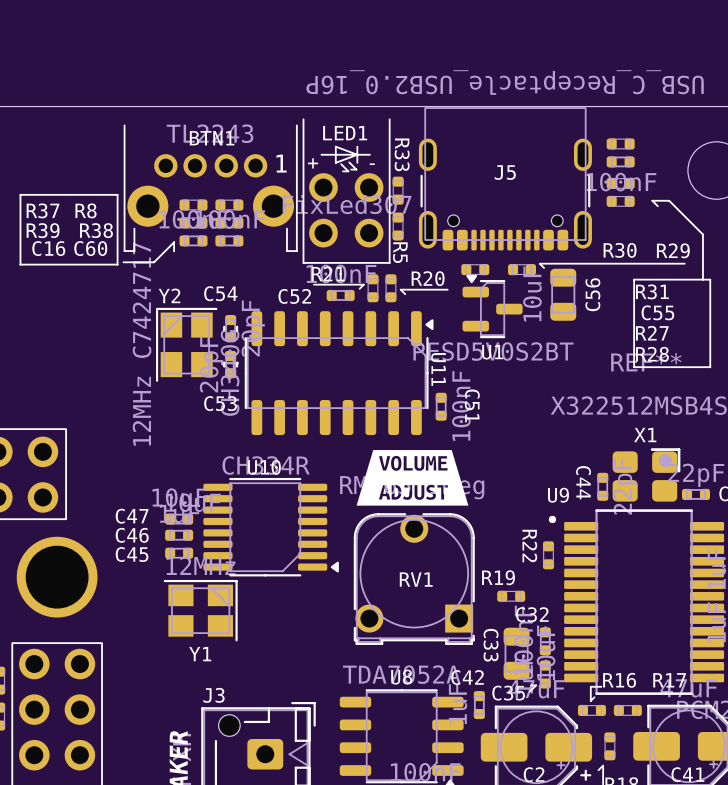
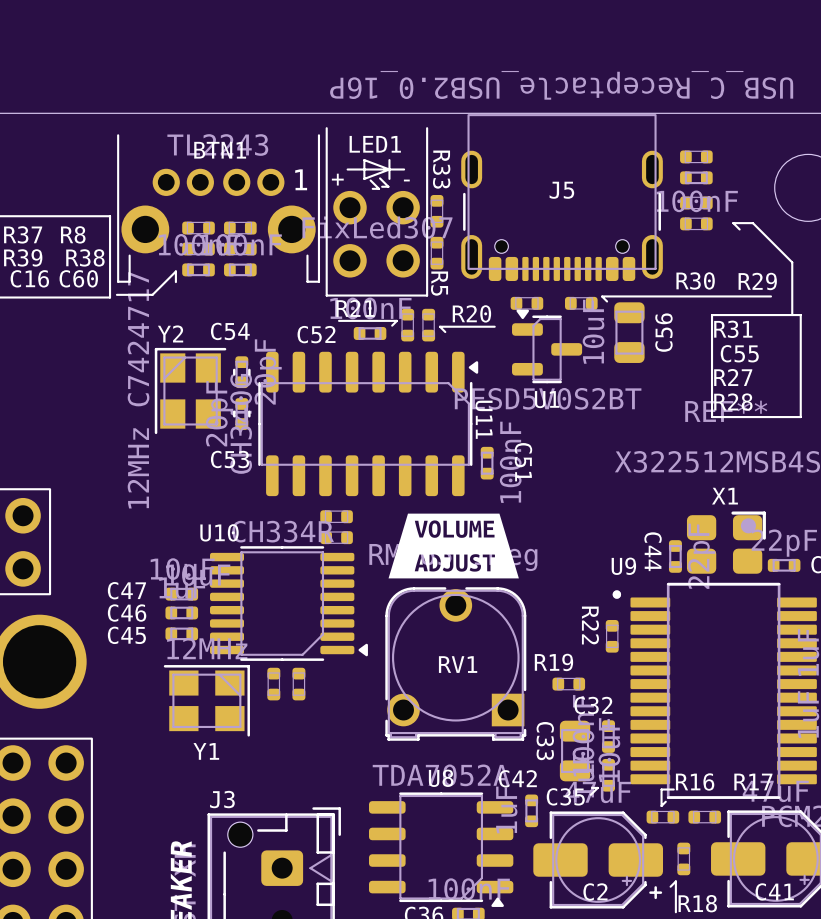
part: none -> (336, 516)
U10 name position: U10 (264, 467) -> U10 (219, 532)
part: none -> (336, 537)
part: none -> (273, 684)
part: none -> (298, 684)

